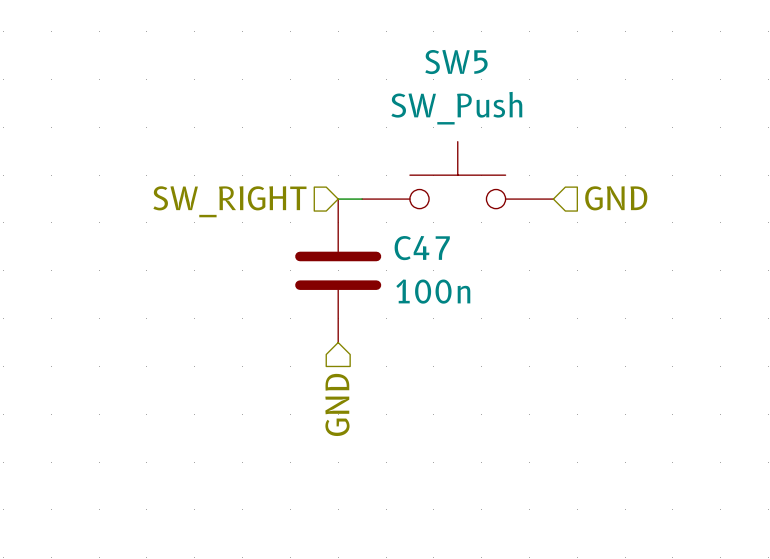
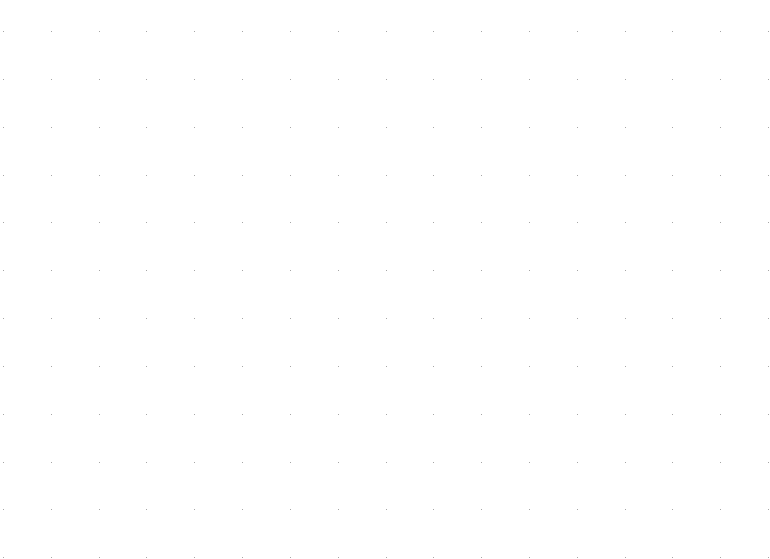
SW5: SW_Push (457, 175) -> none
hierarchical label: GND (616, 198) -> none
wire: (338, 199) (362, 199) -> none
hierarchical label: SW_RIGHT (229, 201) -> none
C47: 100n (338, 270) -> none
hierarchical label: GND (337, 404) -> none

